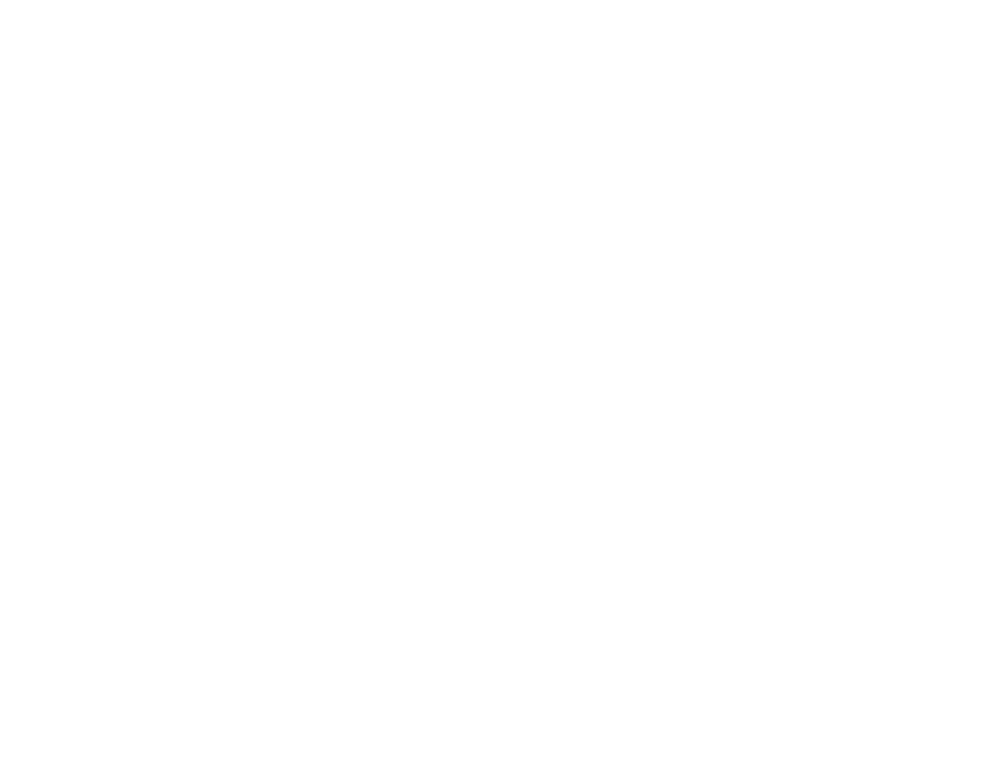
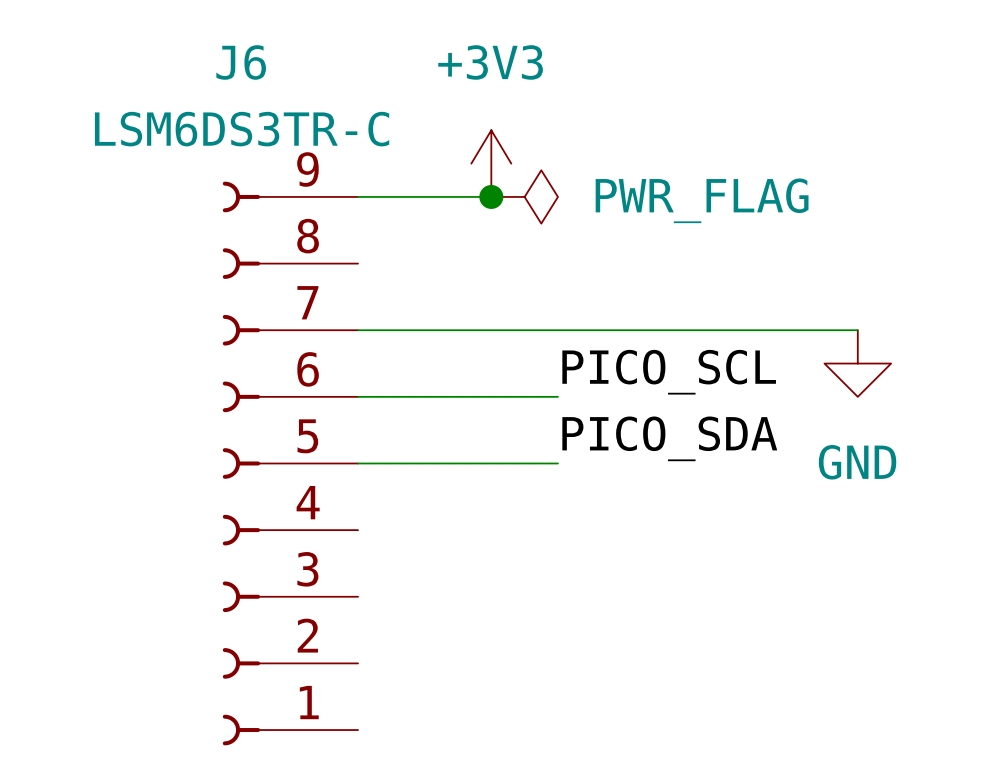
power symbol: none -> +3V3 (491, 163)
wire: none -> (358, 196) (491, 196)
junction: none -> (491, 196)
power symbol: none -> PWR_FLAG (524, 196)
wire: none -> (358, 330) (857, 330)
power symbol: none -> GND (857, 363)
label: none -> PICO_SCL (669, 372)
wire: none -> (358, 396) (557, 396)
label: none -> PICO_SDA (669, 438)
J6: none -> LSM6DS3TR-C (290, 463)
wire: none -> (358, 463) (557, 463)

